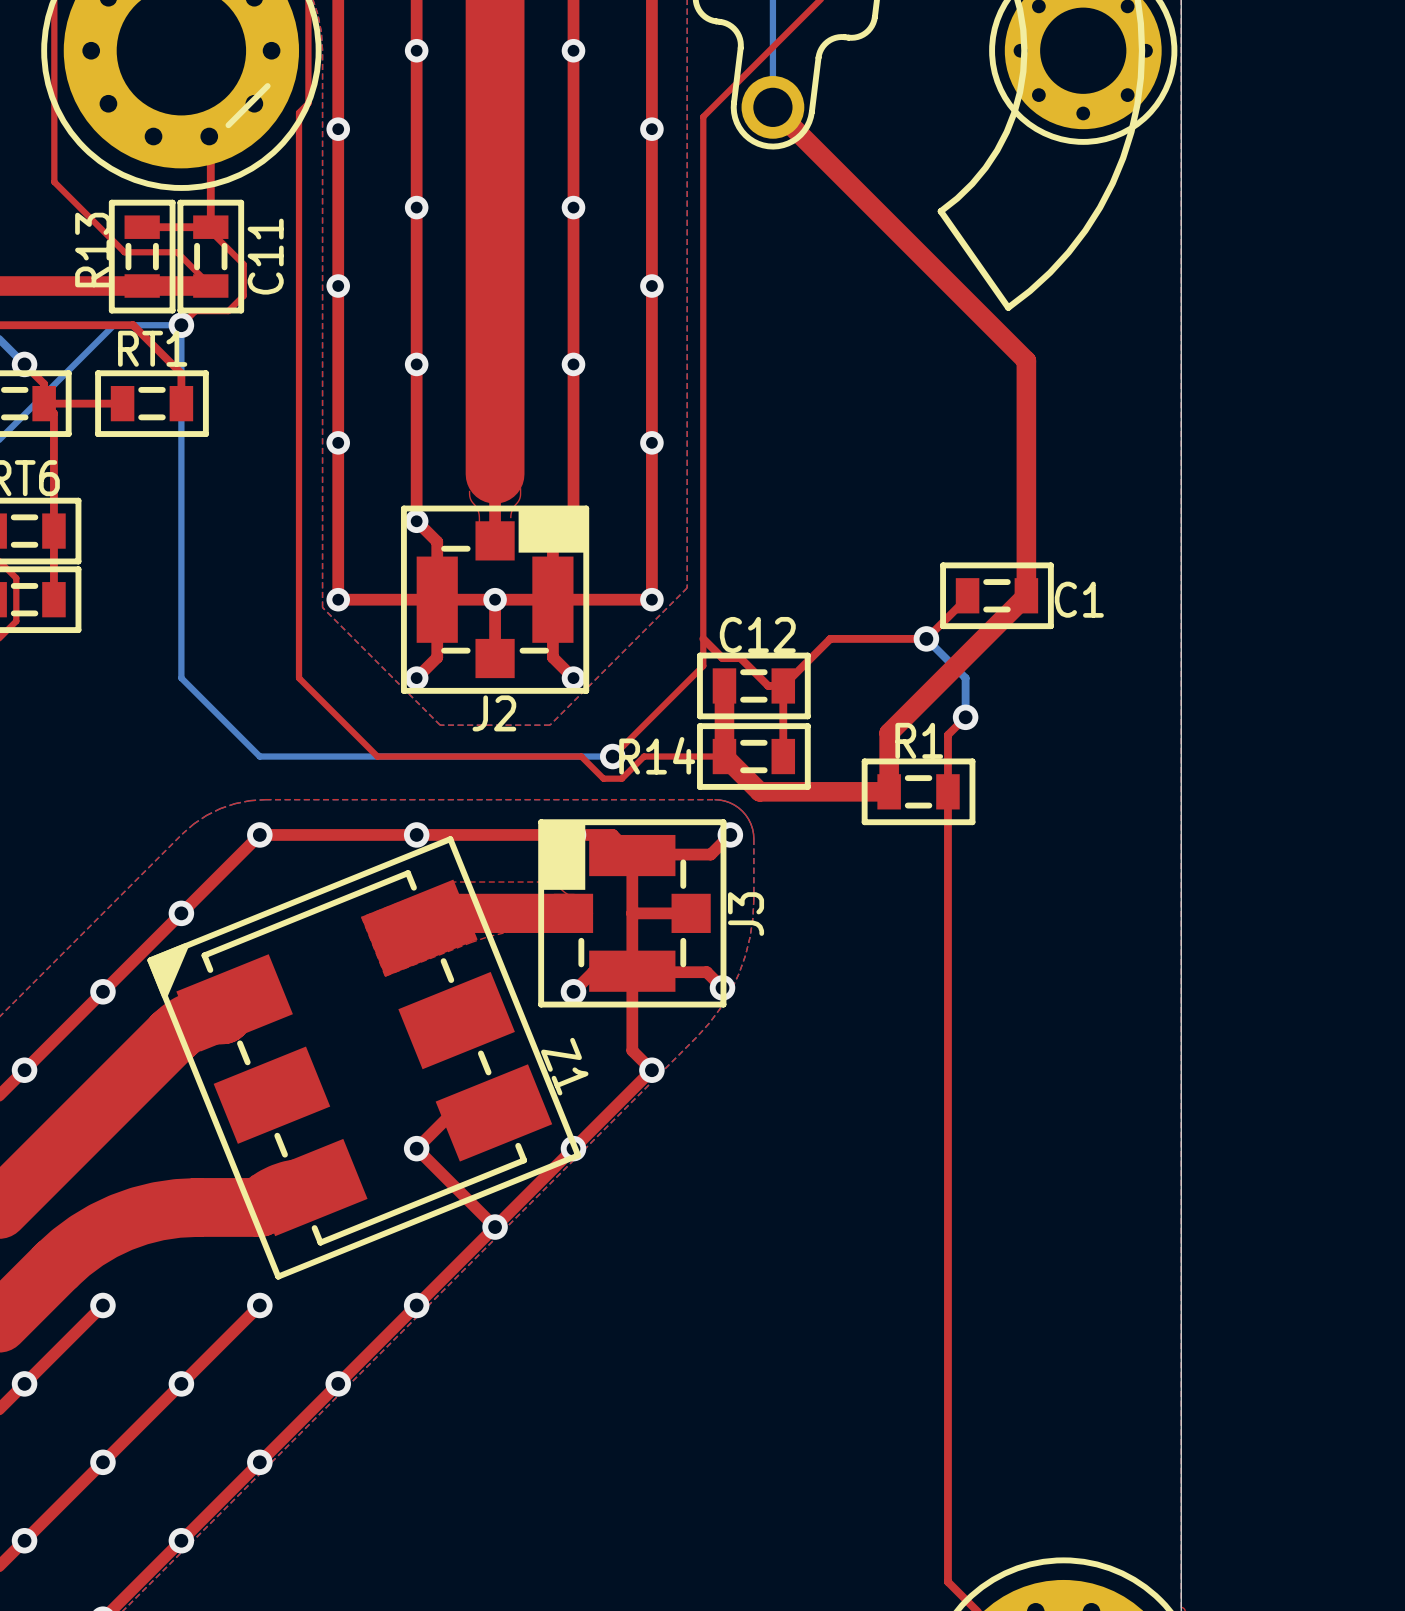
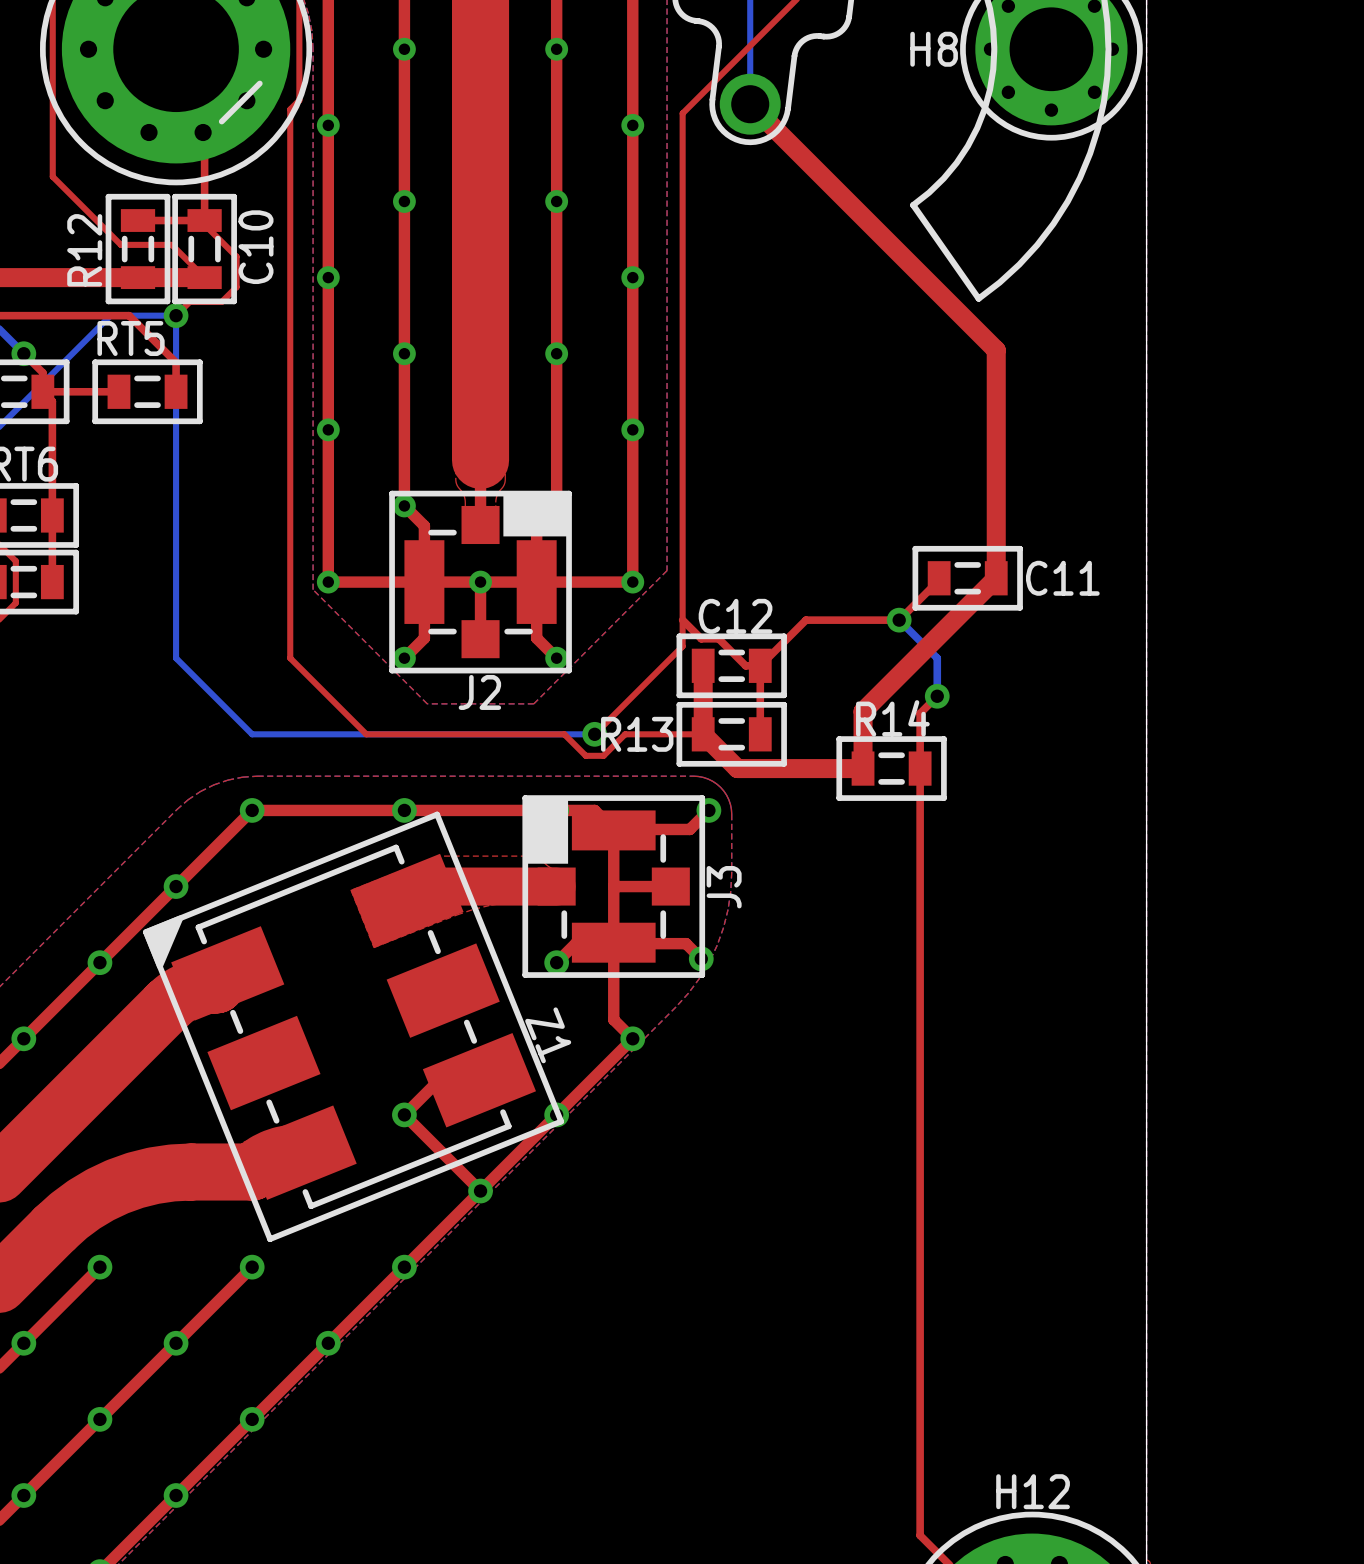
H8 name: none -> H8 (934, 49)
R13 name: R13 (93, 250) -> R12 (84, 250)
C11 name: C11 (265, 256) -> C10 (255, 247)
RT1 name: RT1 (152, 348) -> RT5 (131, 338)
C1 name: C1 (1079, 599) -> C11 (1062, 578)
R1 name: R1 (919, 740) -> R14 (892, 718)
R14 name: R14 (657, 755) -> R13 (637, 734)
H12 name: none -> H12 (1033, 1491)

